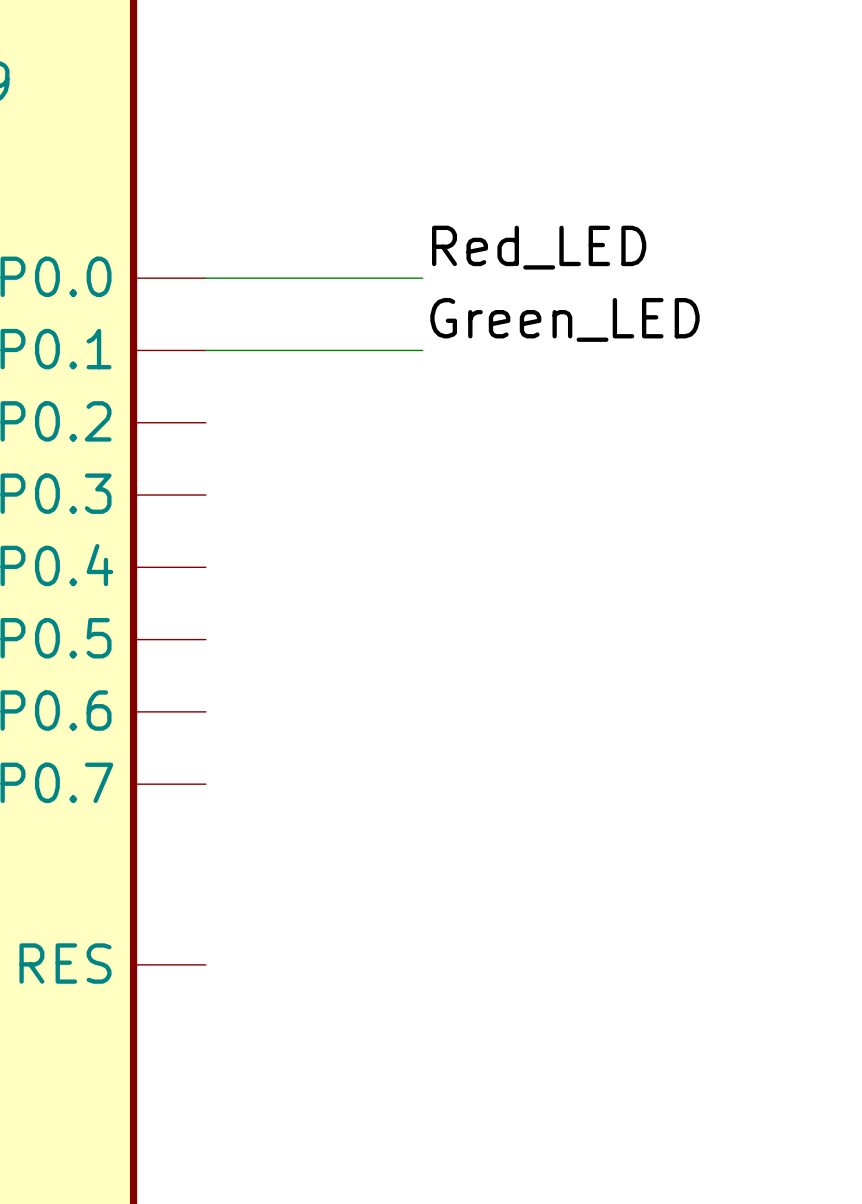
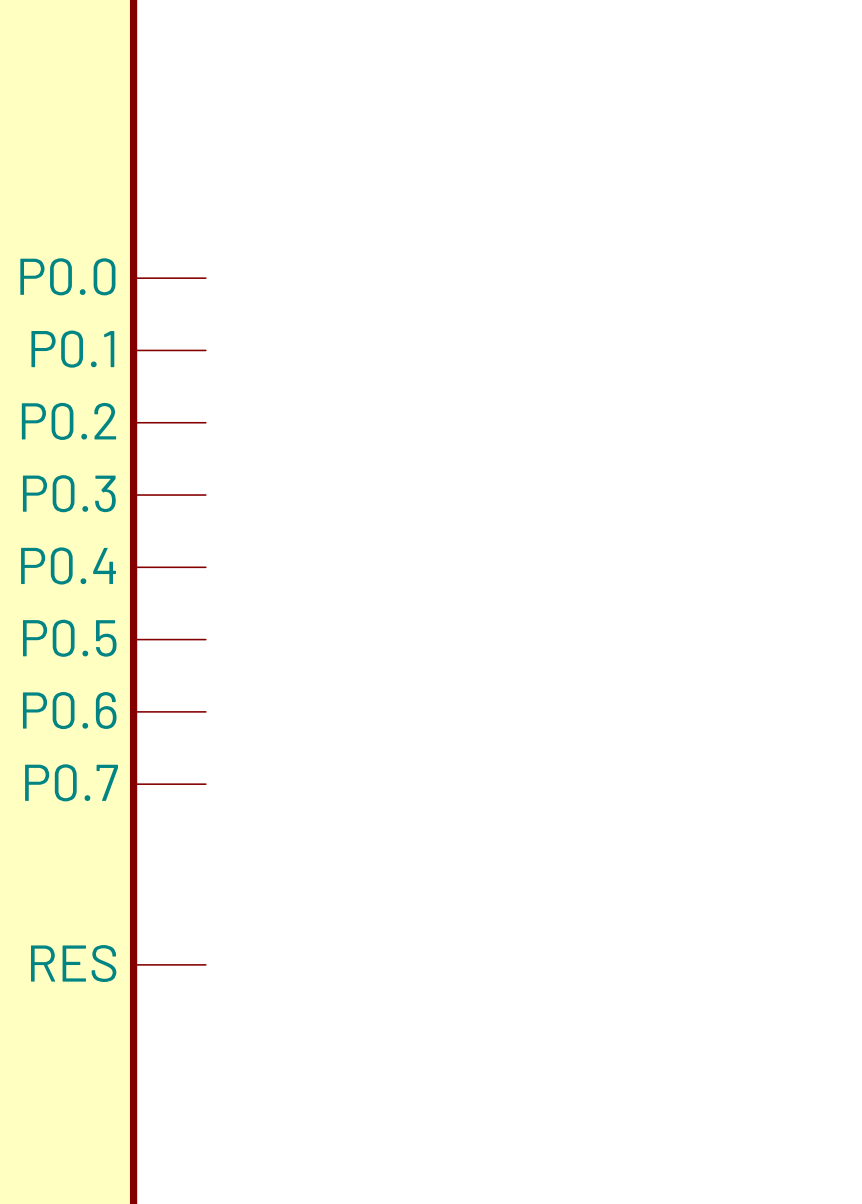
label: Red_LED (539, 247) -> none
wire: (205, 278) (422, 278) -> none
label: Green_LED (564, 319) -> none
wire: (205, 350) (422, 350) -> none

